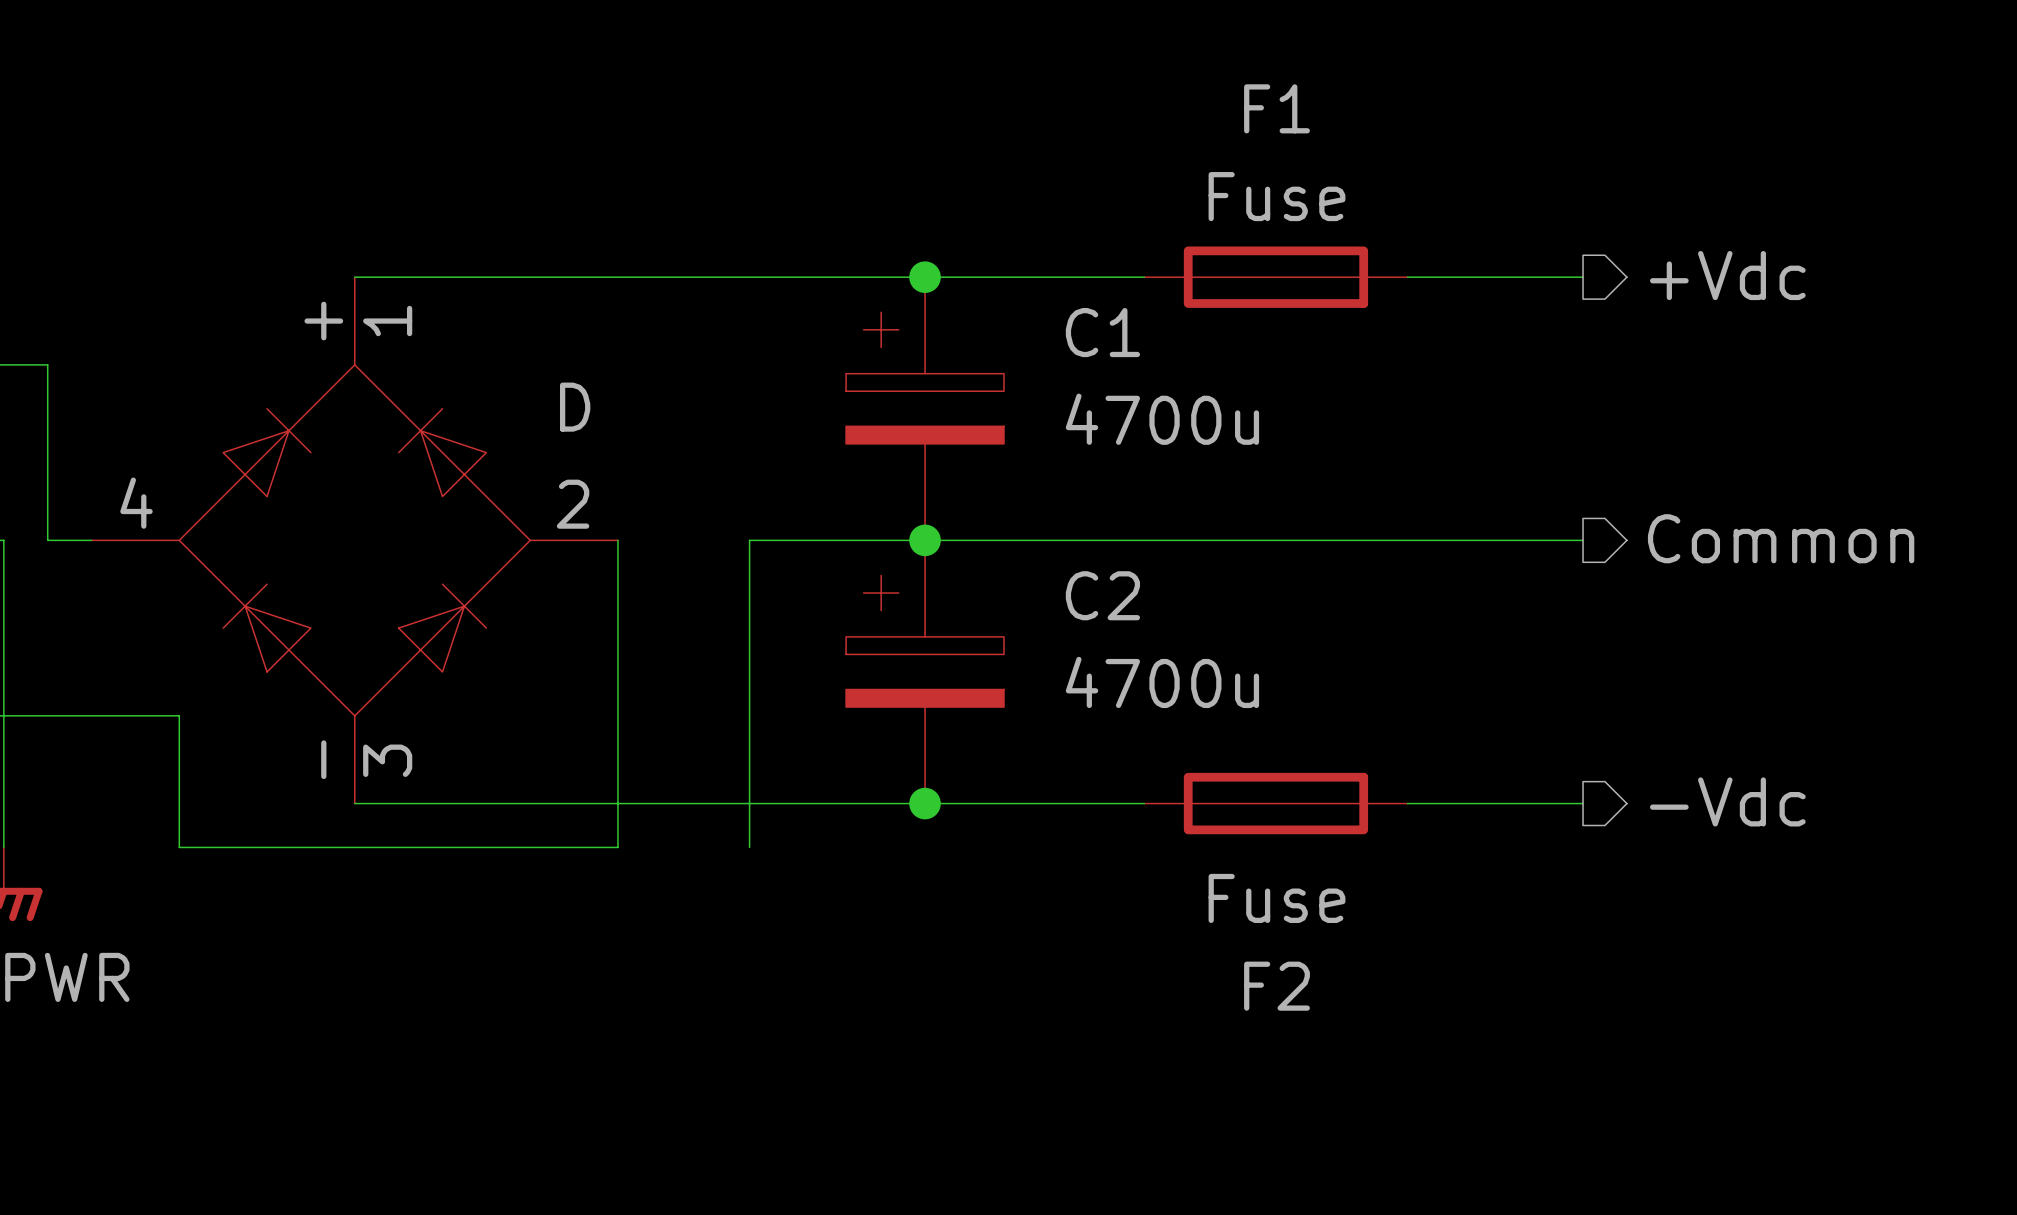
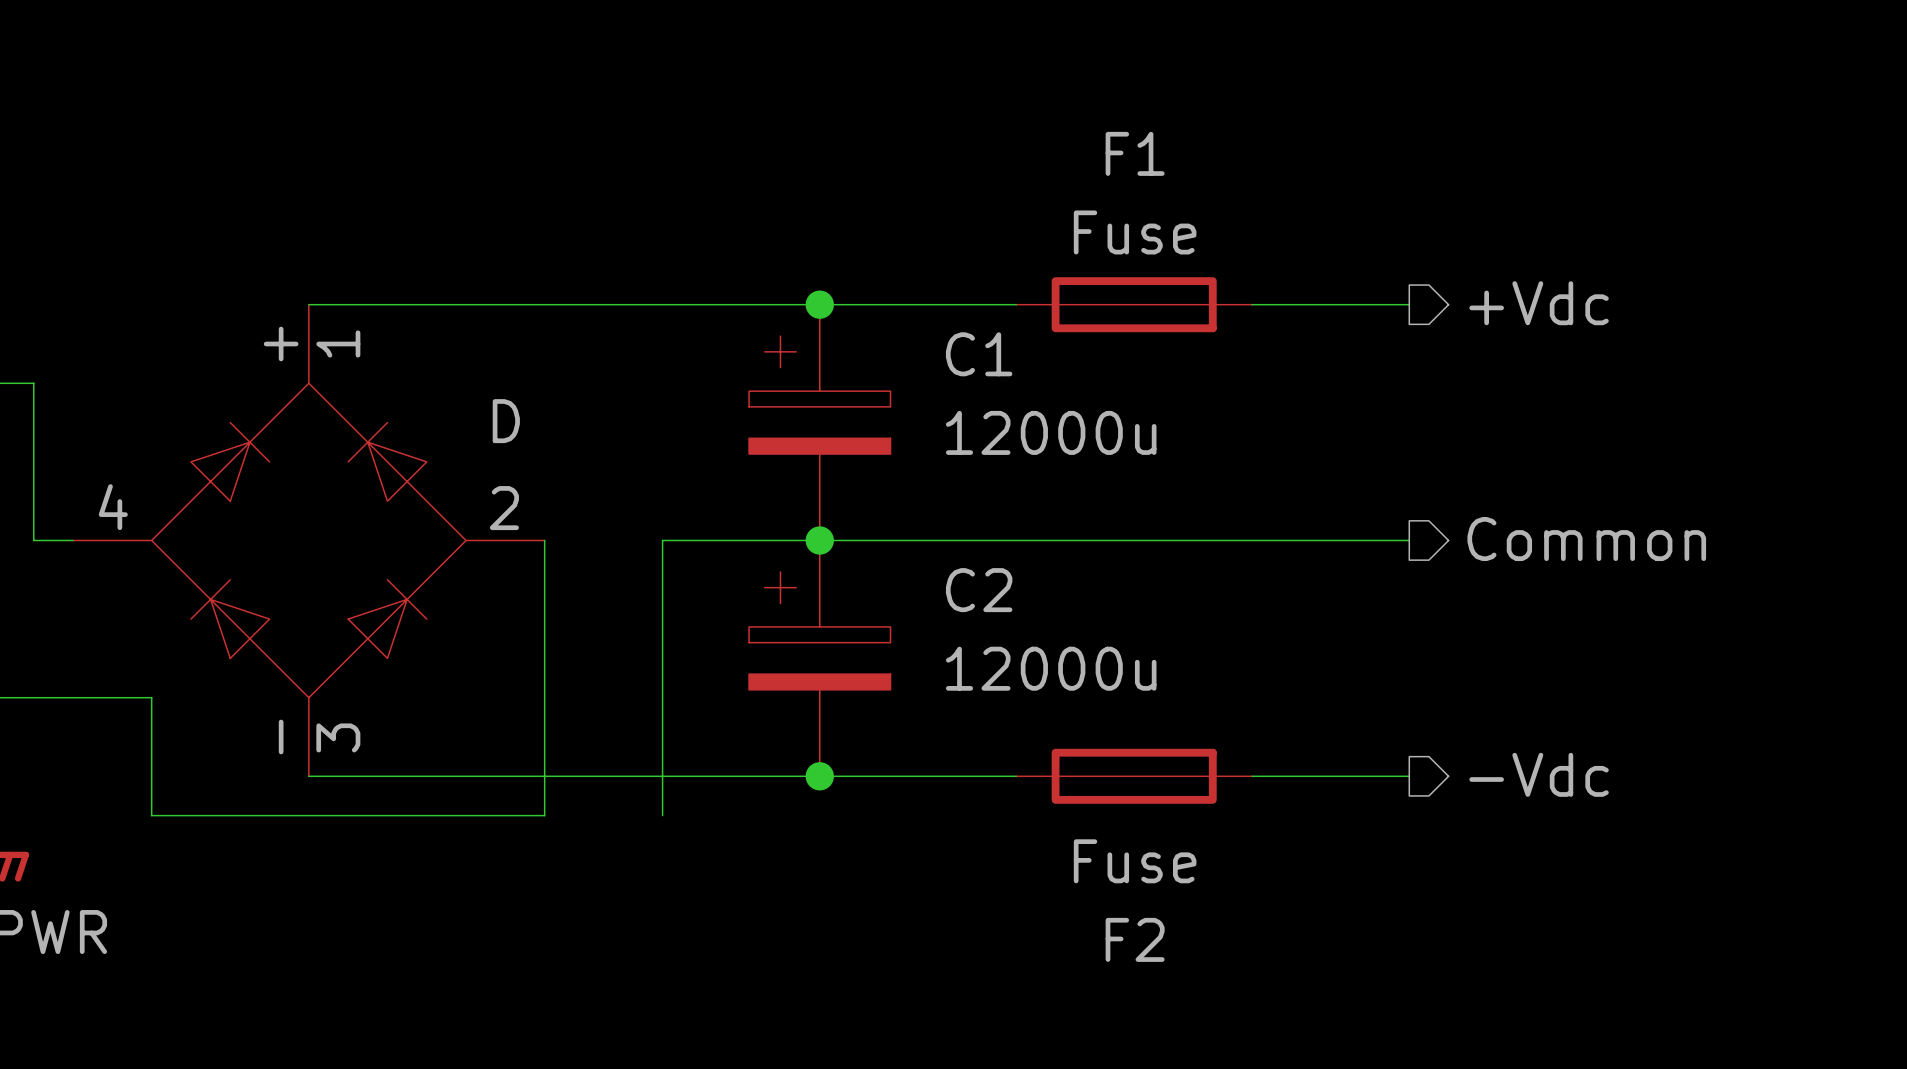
C1 value: 4700u (1162, 419) -> 12000u (1051, 432)
C2 value: 4700u (1162, 682) -> 12000u (1051, 668)

